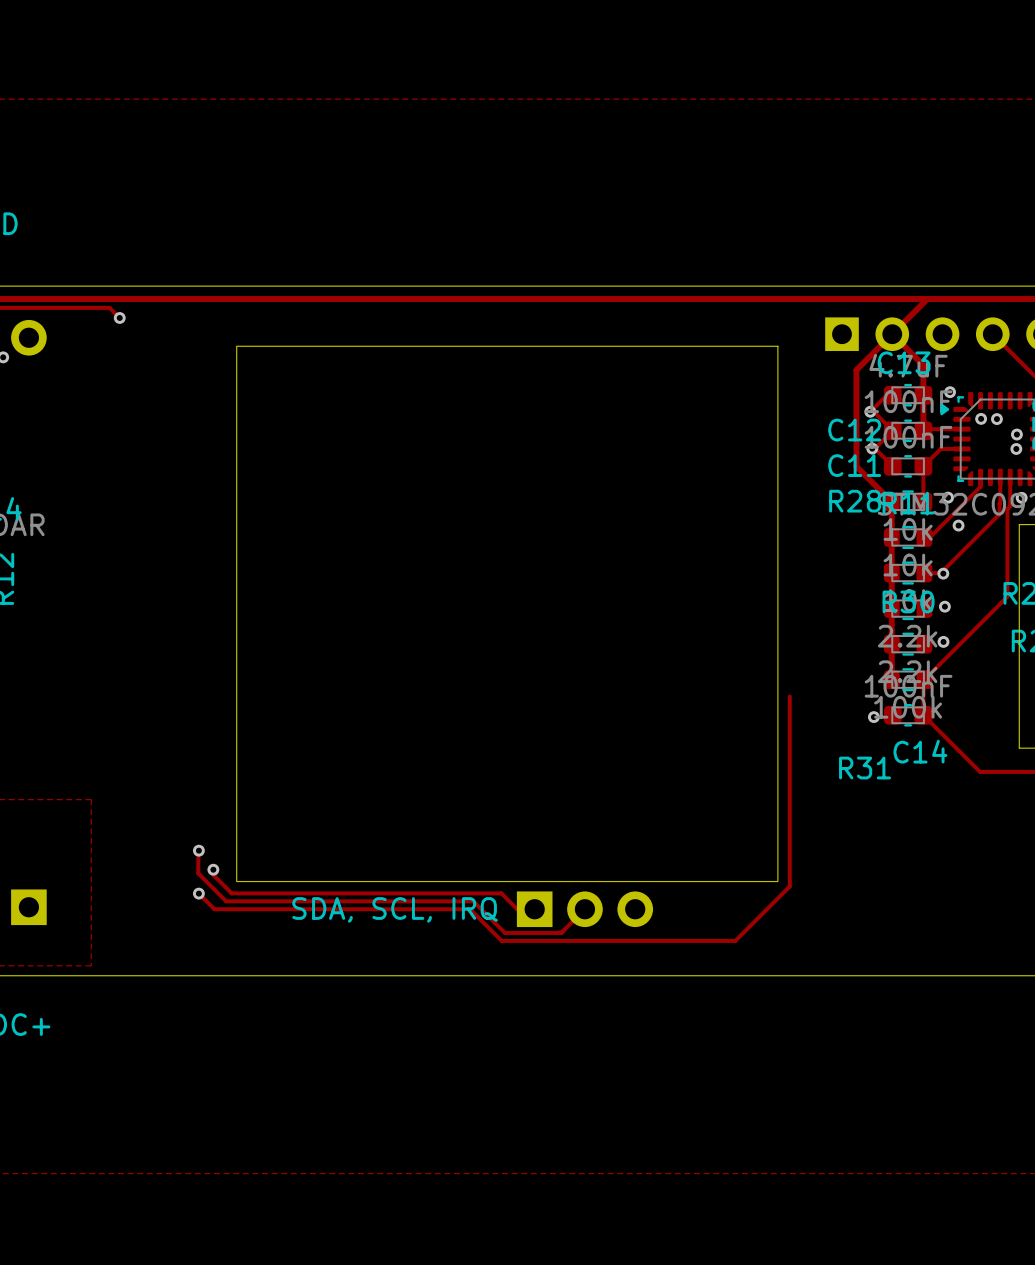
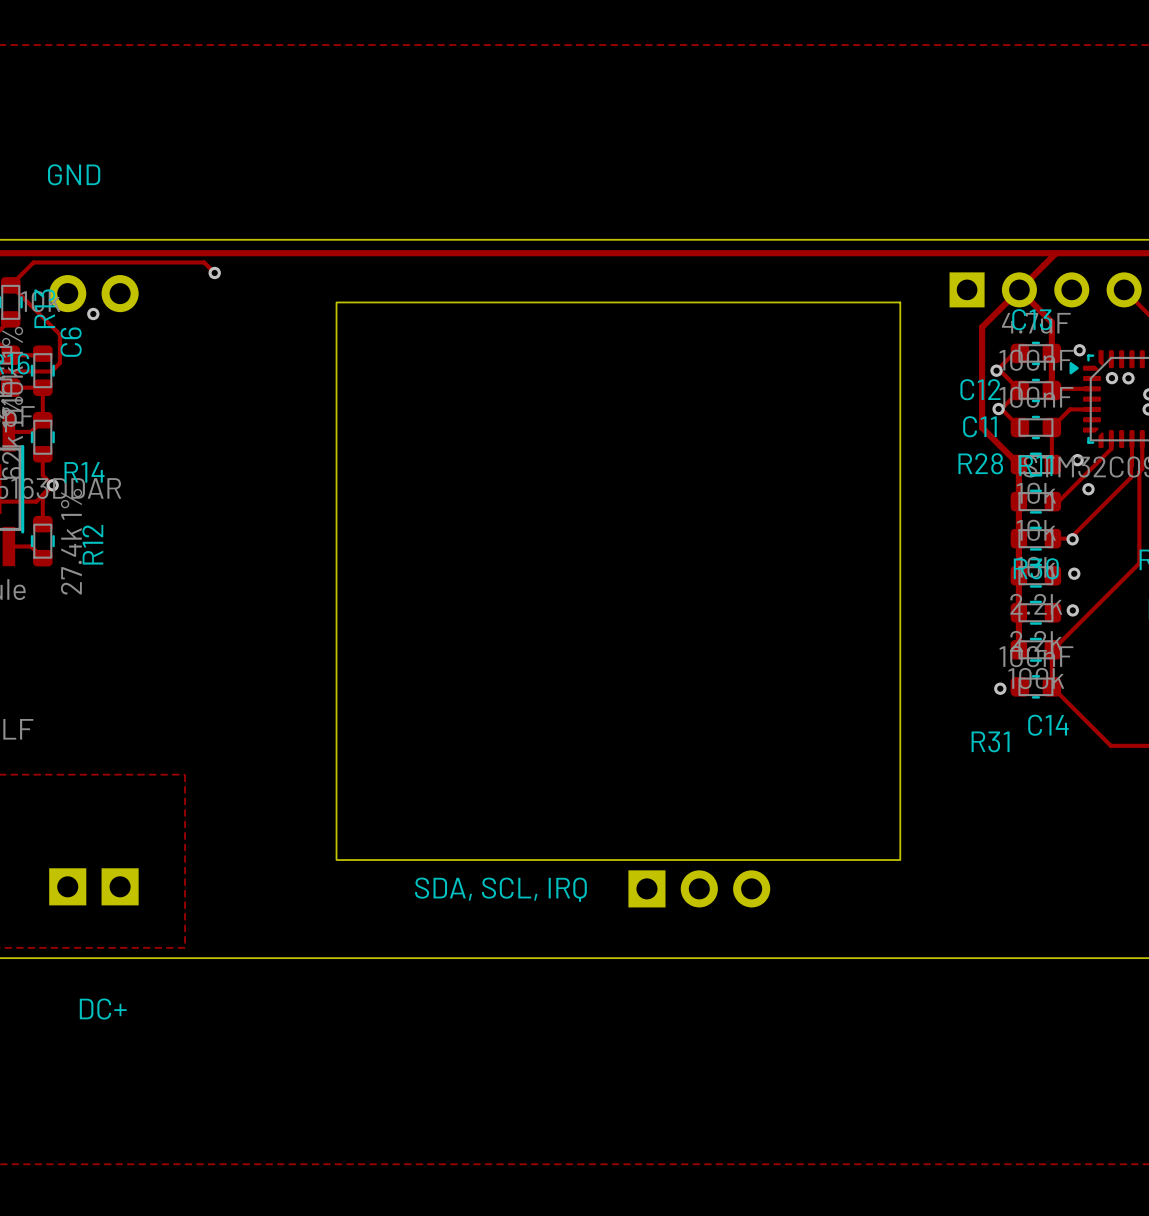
track: (789, 696) (789, 886) (735, 940) (501, 940) (470, 909) (214, 909) (198, 893) -> none
track: (198, 850) (198, 873) (226, 901) (473, 901) (505, 932) (561, 932) (584, 909) -> none
via: (198, 850) -> none
track: (213, 869) (213, 875) (231, 893) (501, 893) (517, 909) (534, 909) -> none
via: (213, 869) -> none
via: (198, 893) -> none

